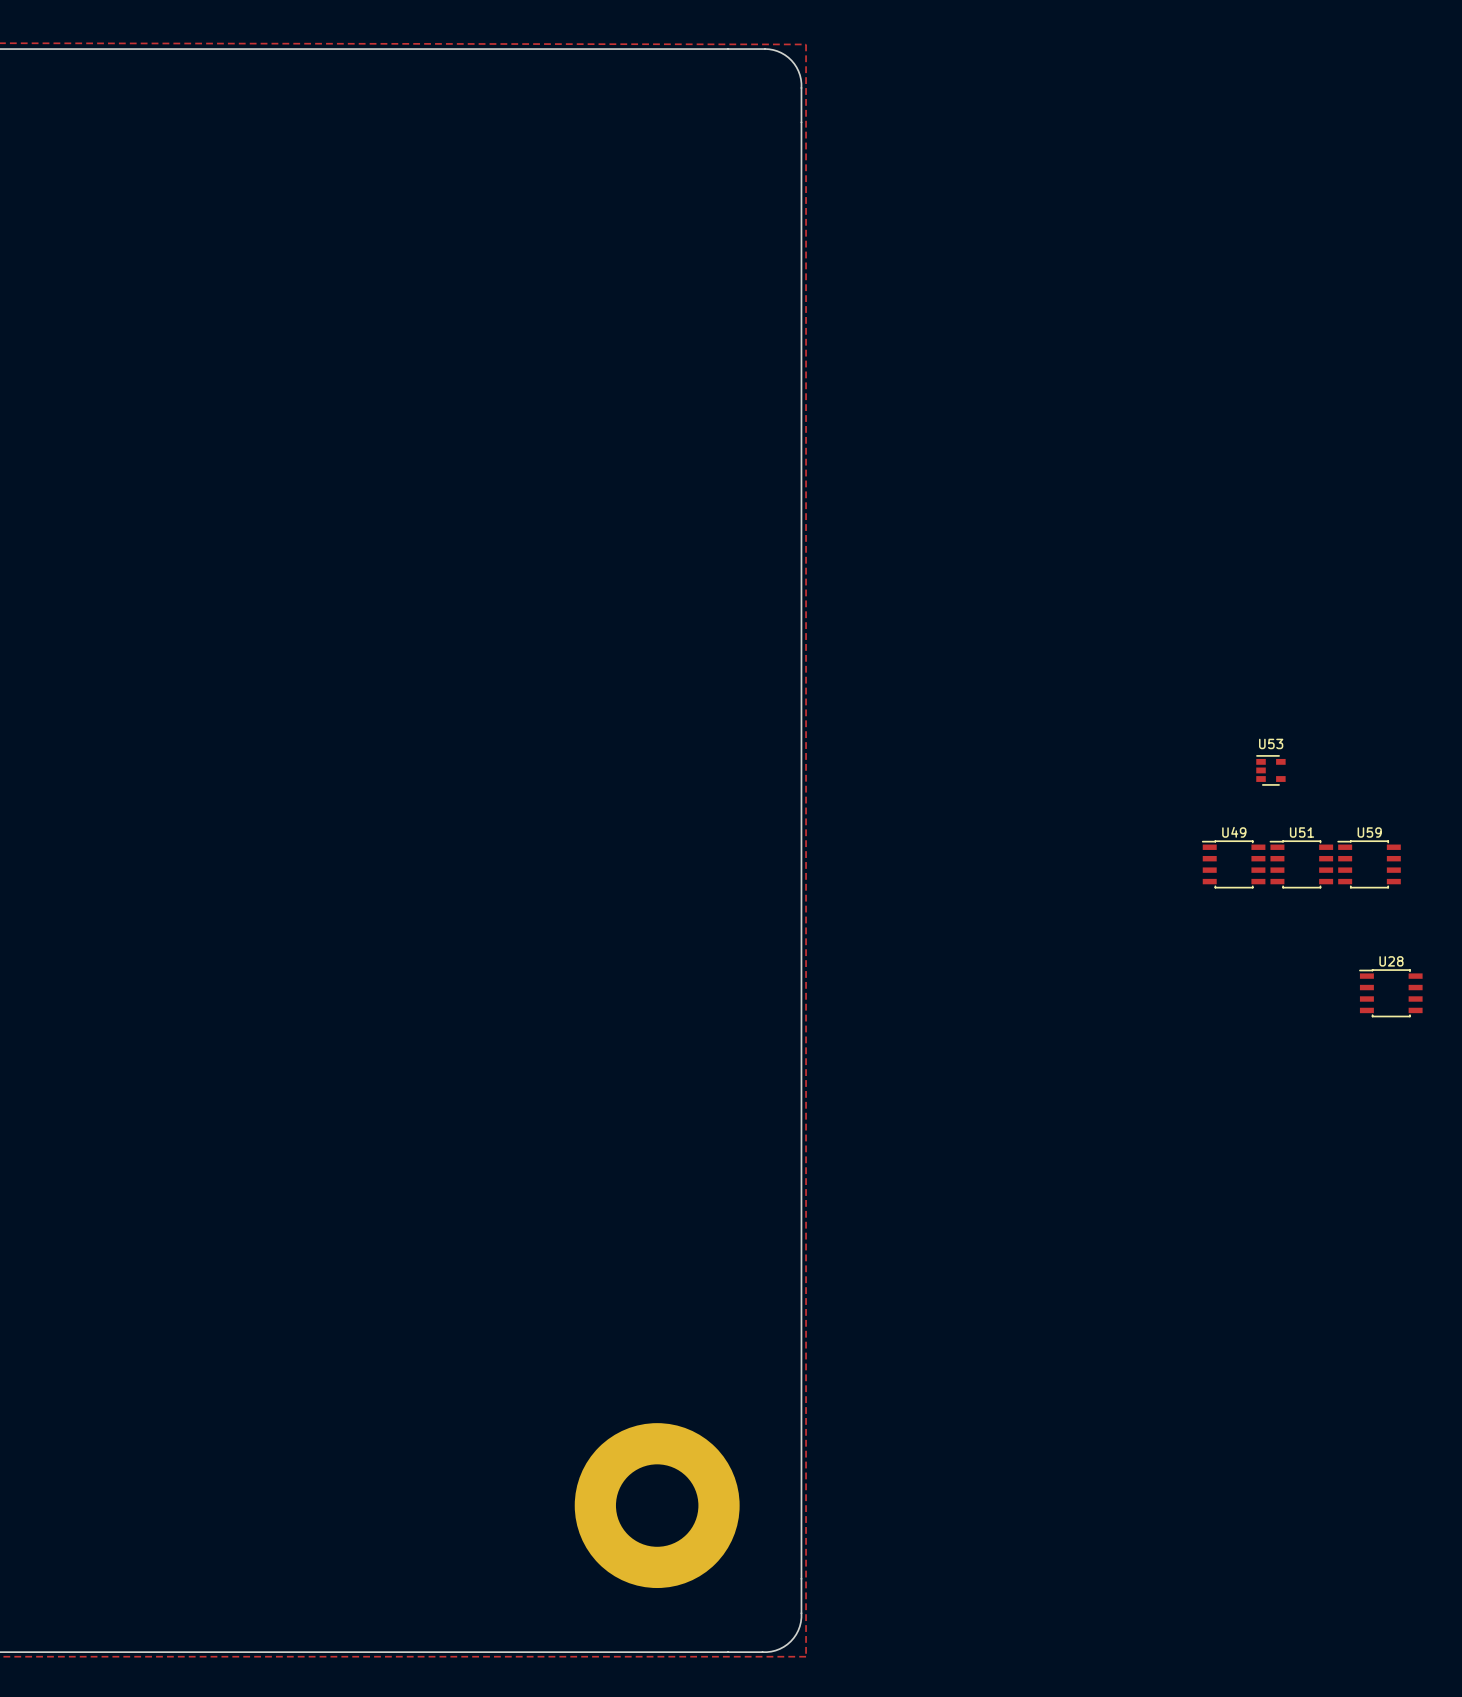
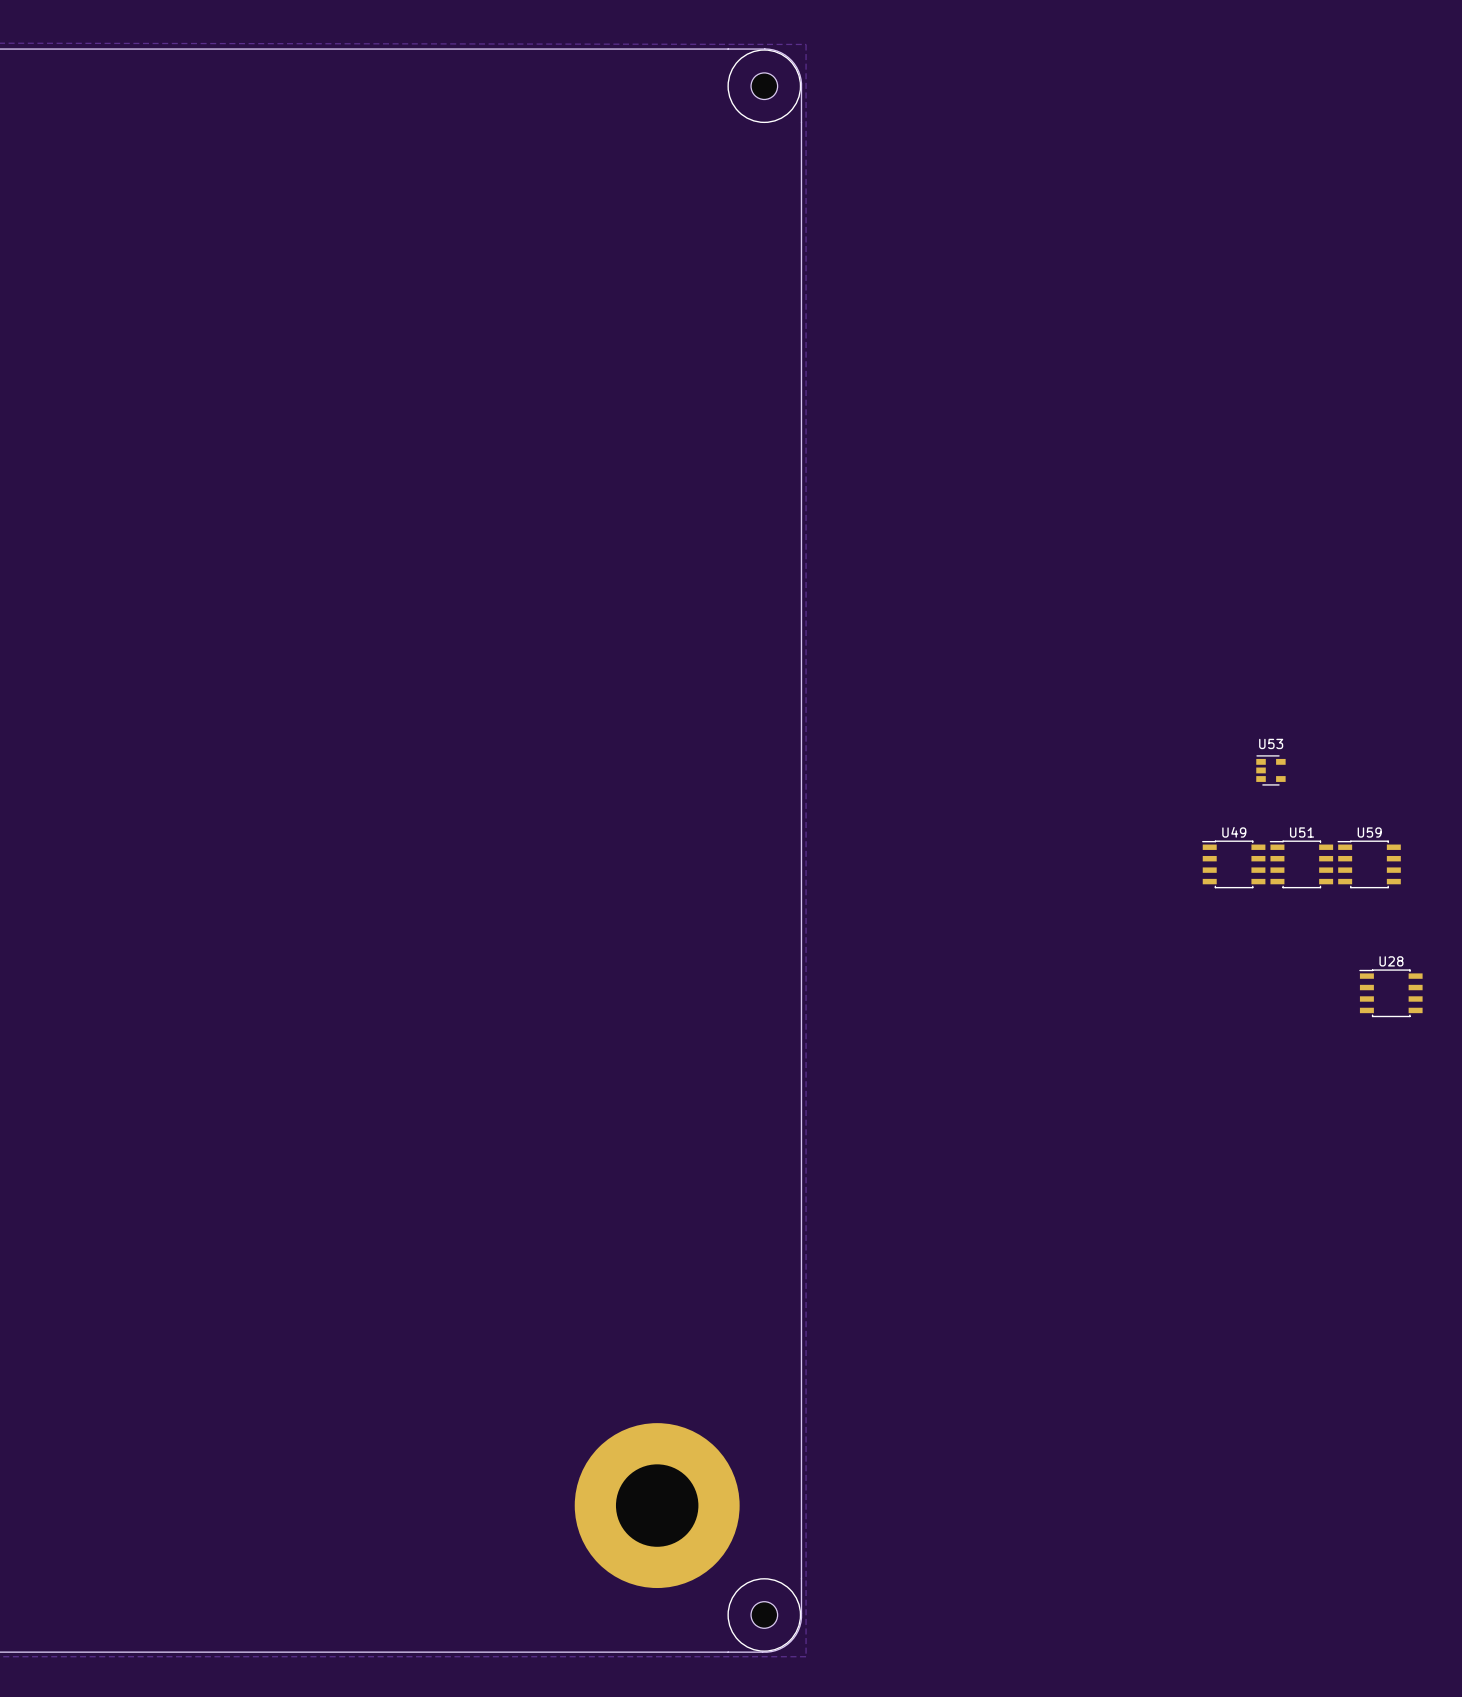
part: none -> (764, 86)
part: none -> (764, 1614)

